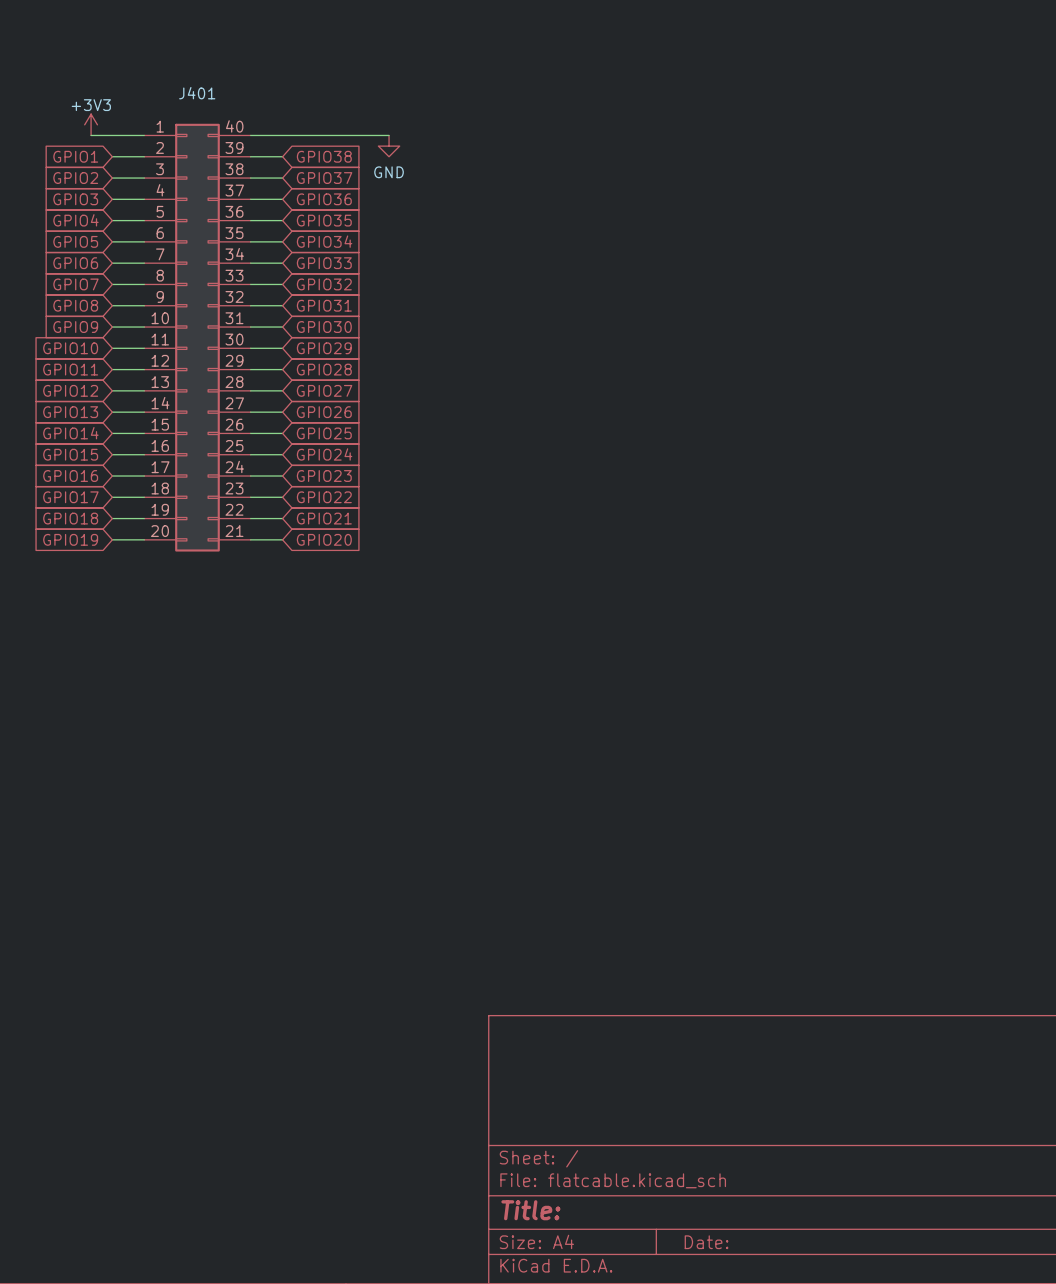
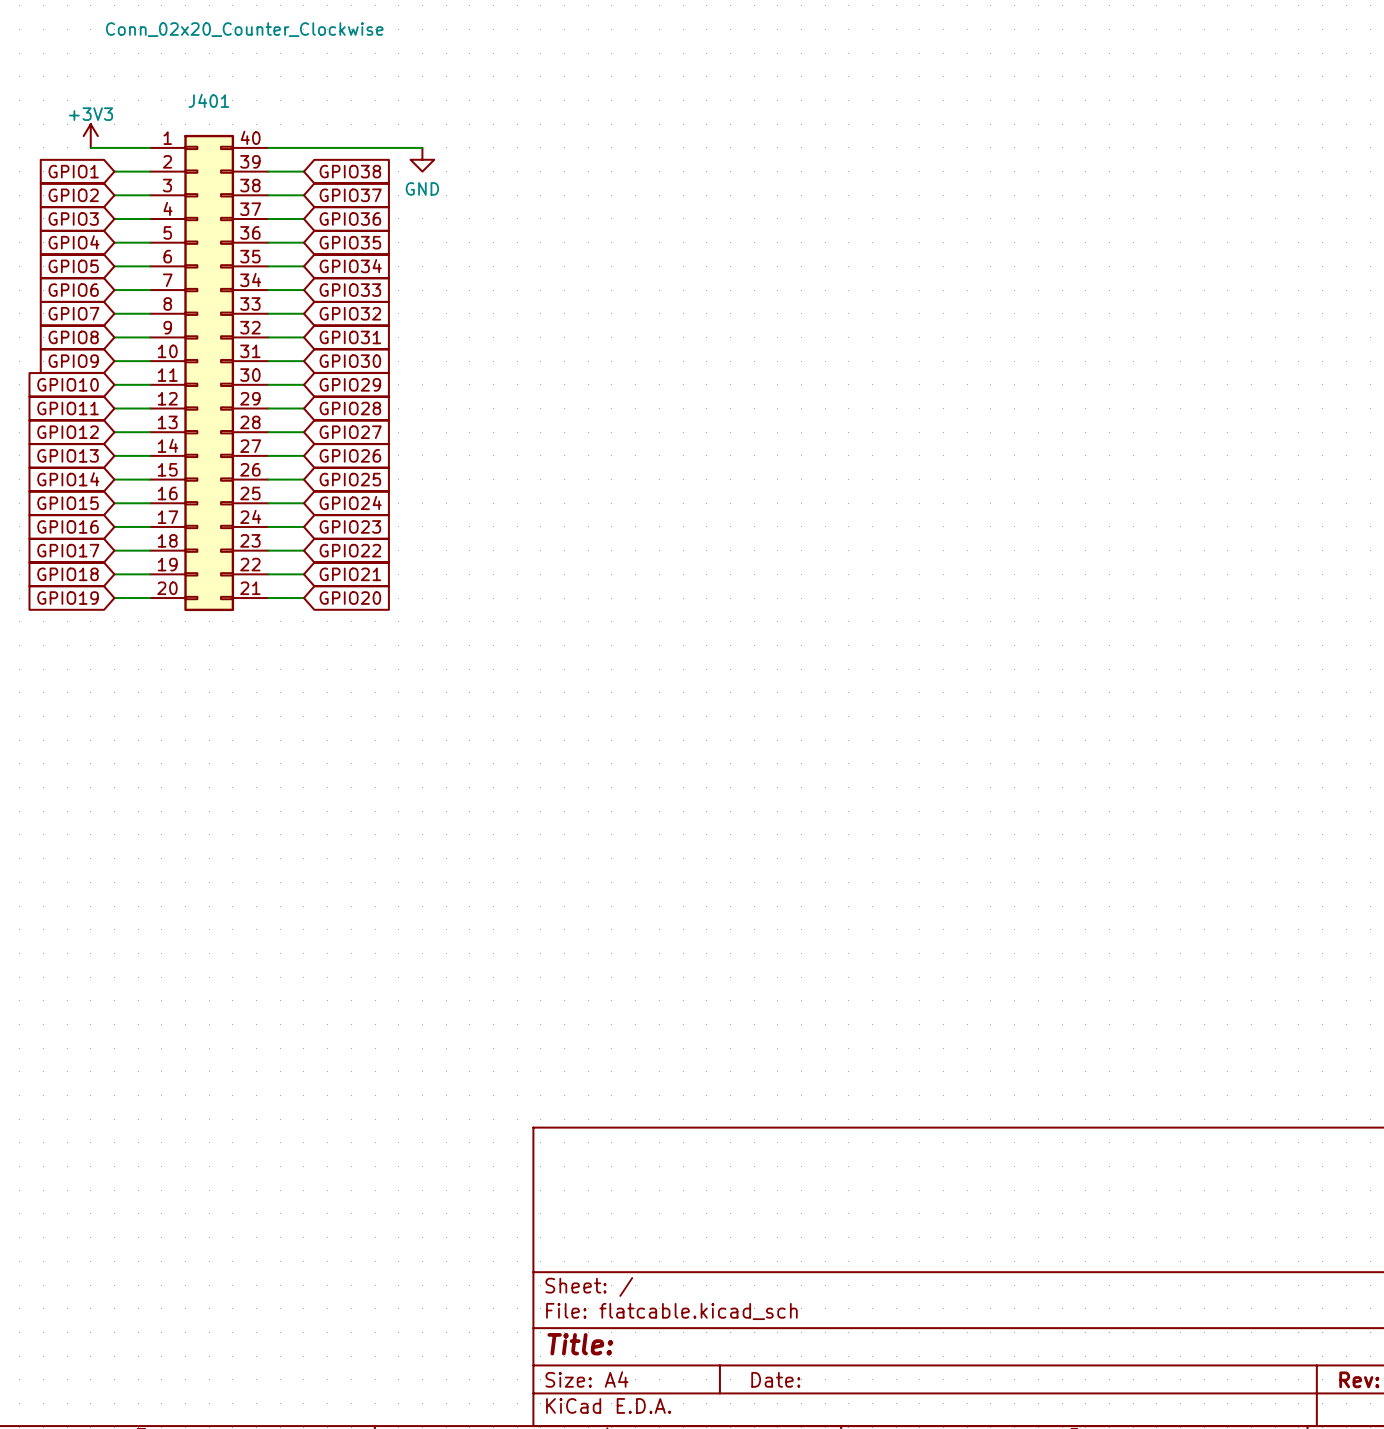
J401 value: none -> Conn_02x20_Counter_Clockwise (244, 29)

